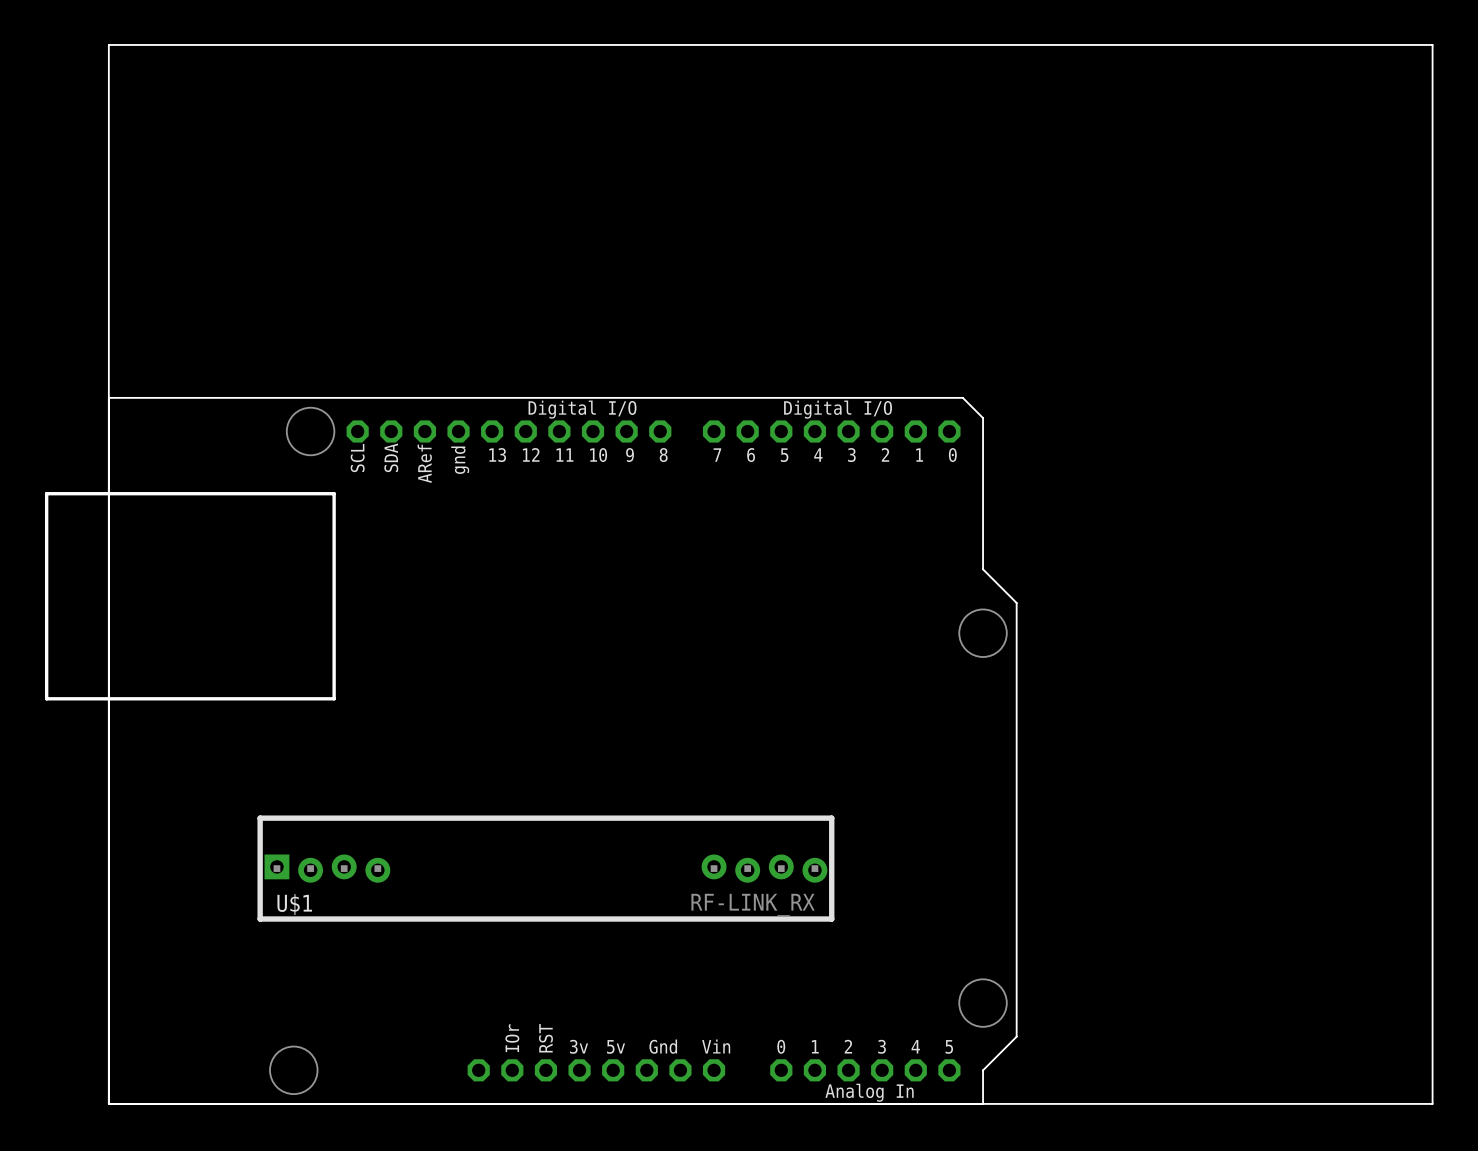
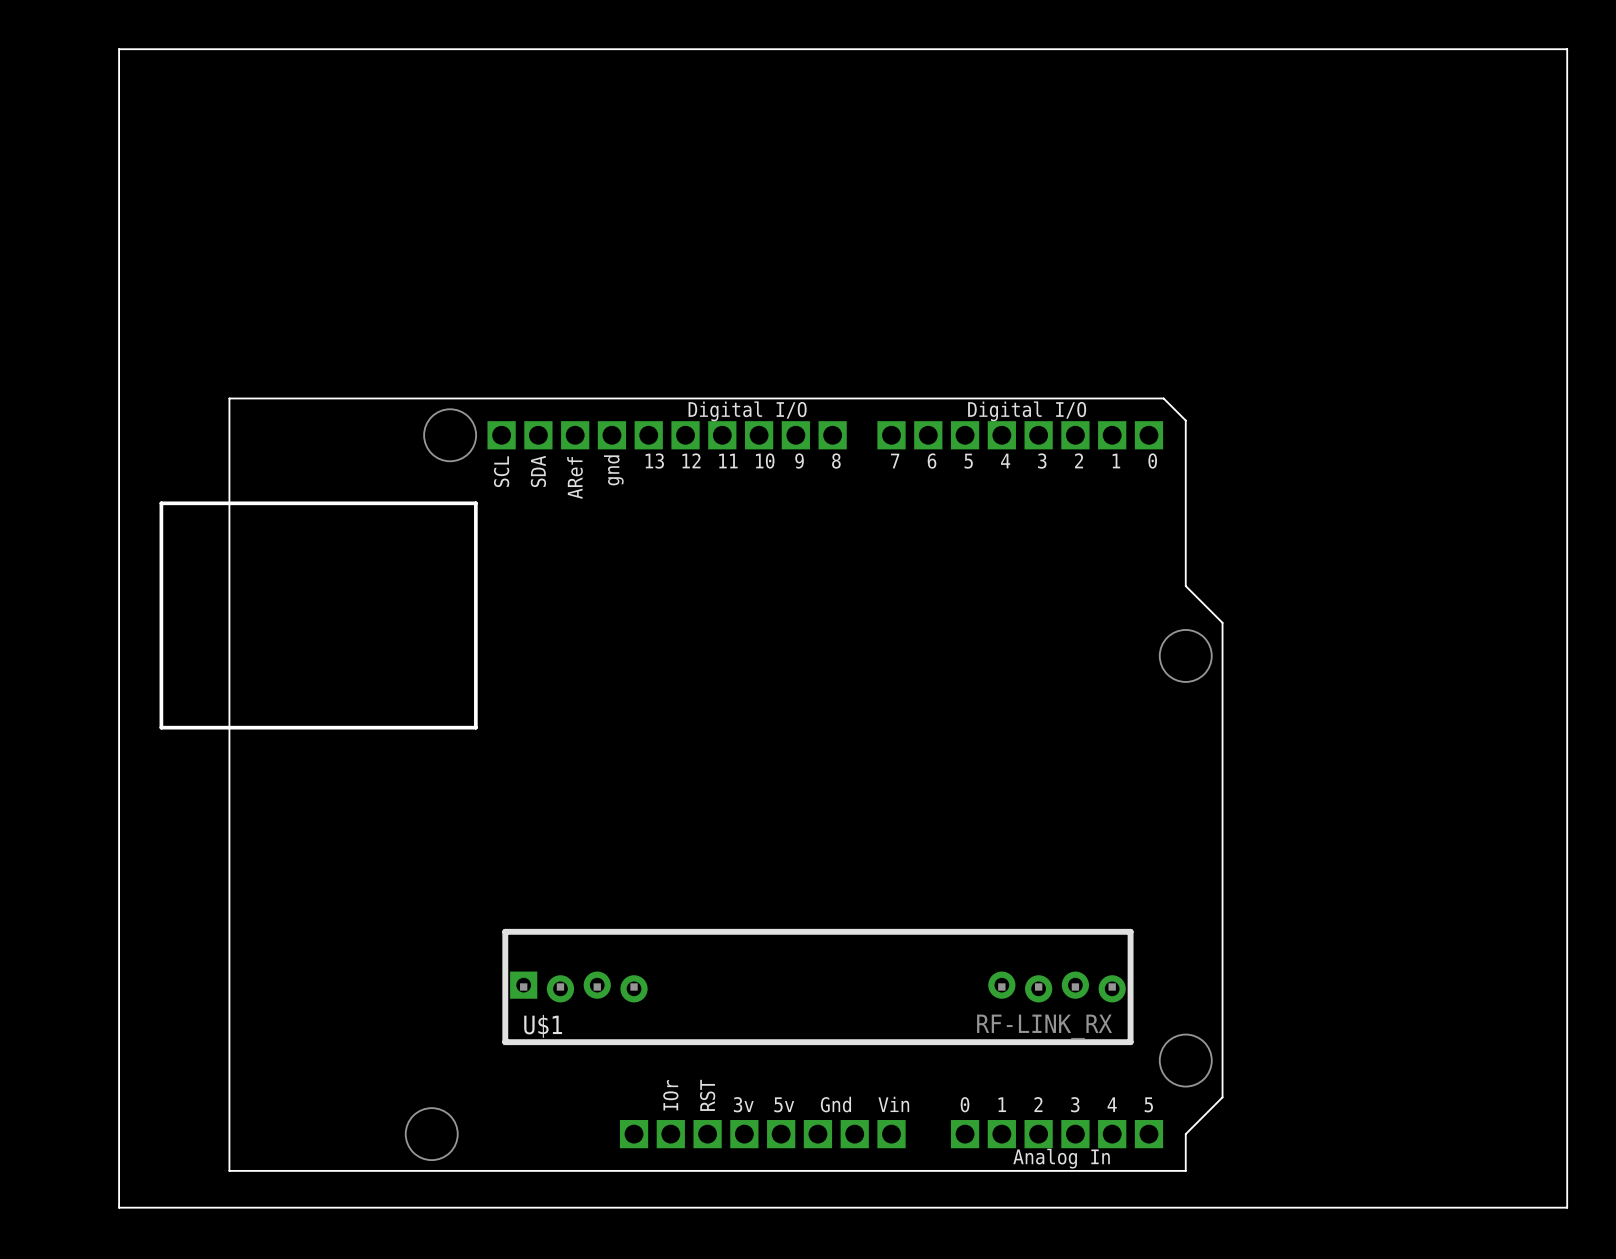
part: none -> (691, 784)
part: (530, 750) -> none
U$1 position: (545, 868) -> (817, 986)

